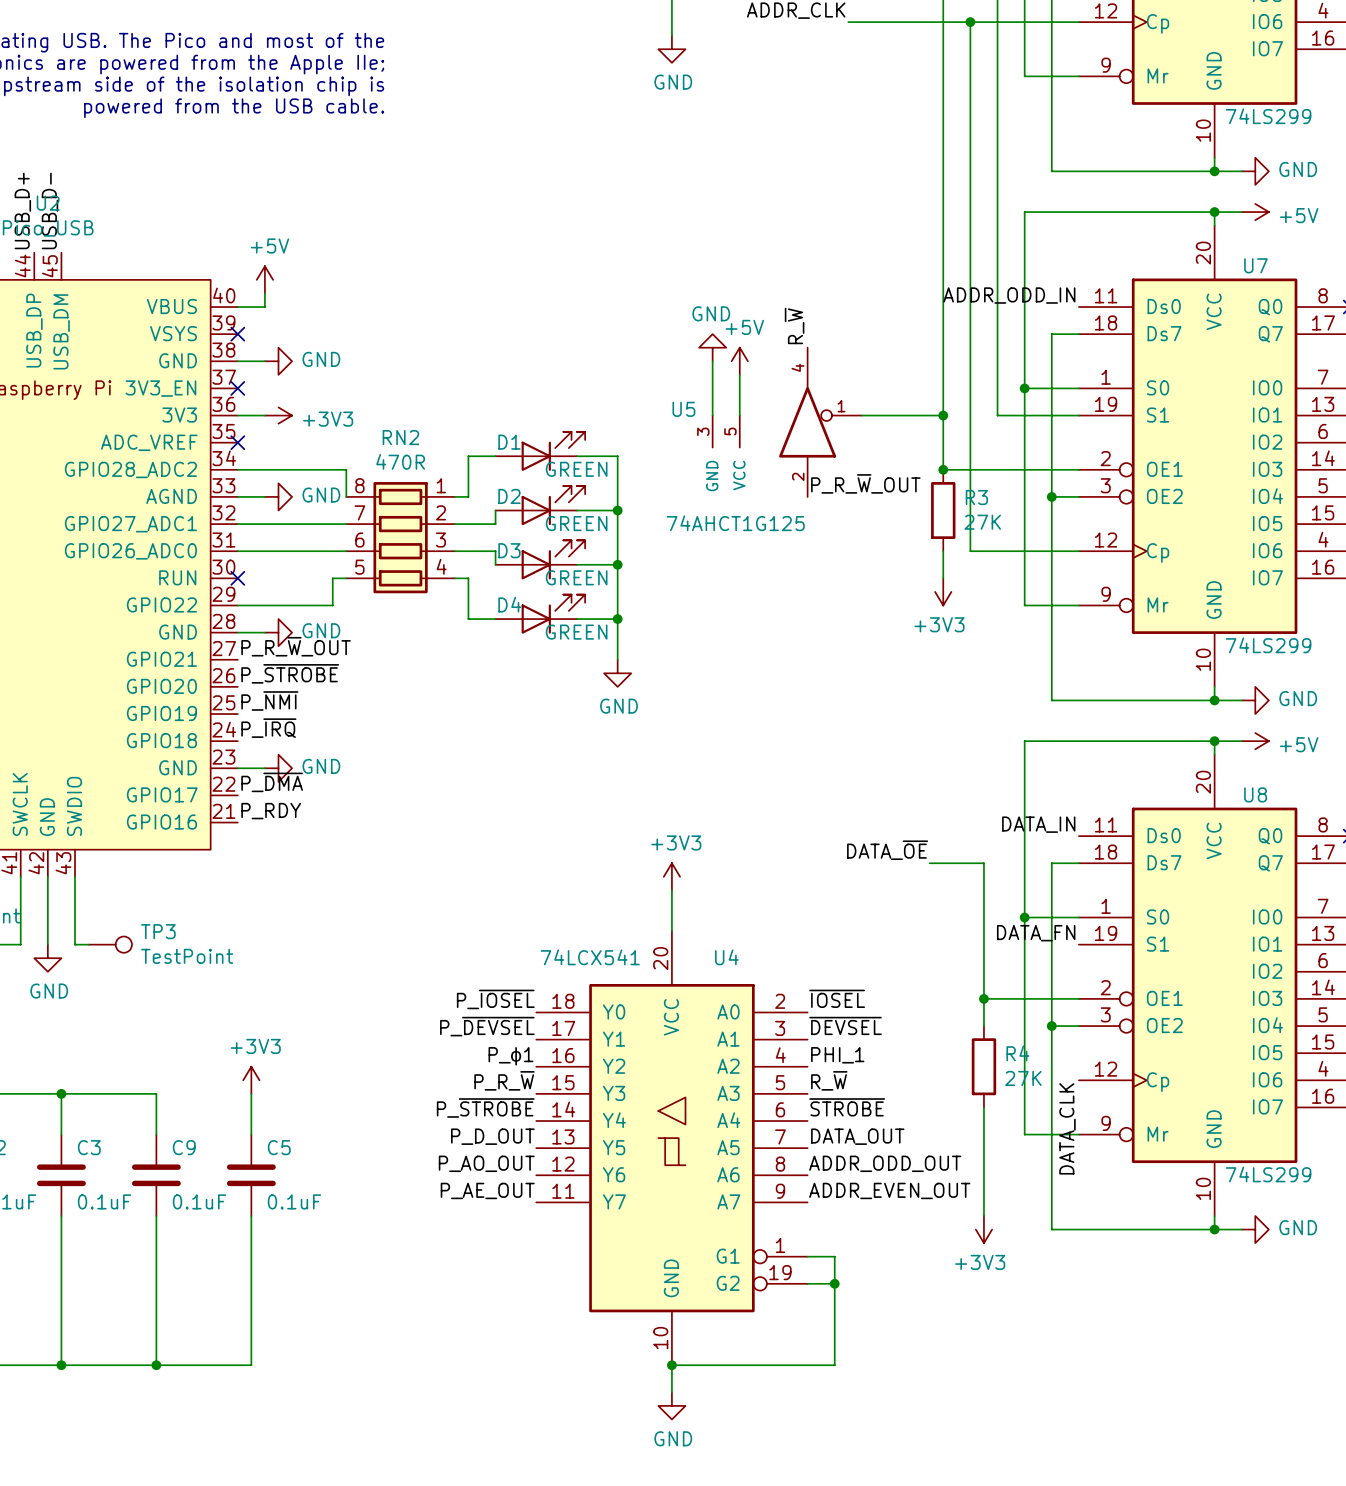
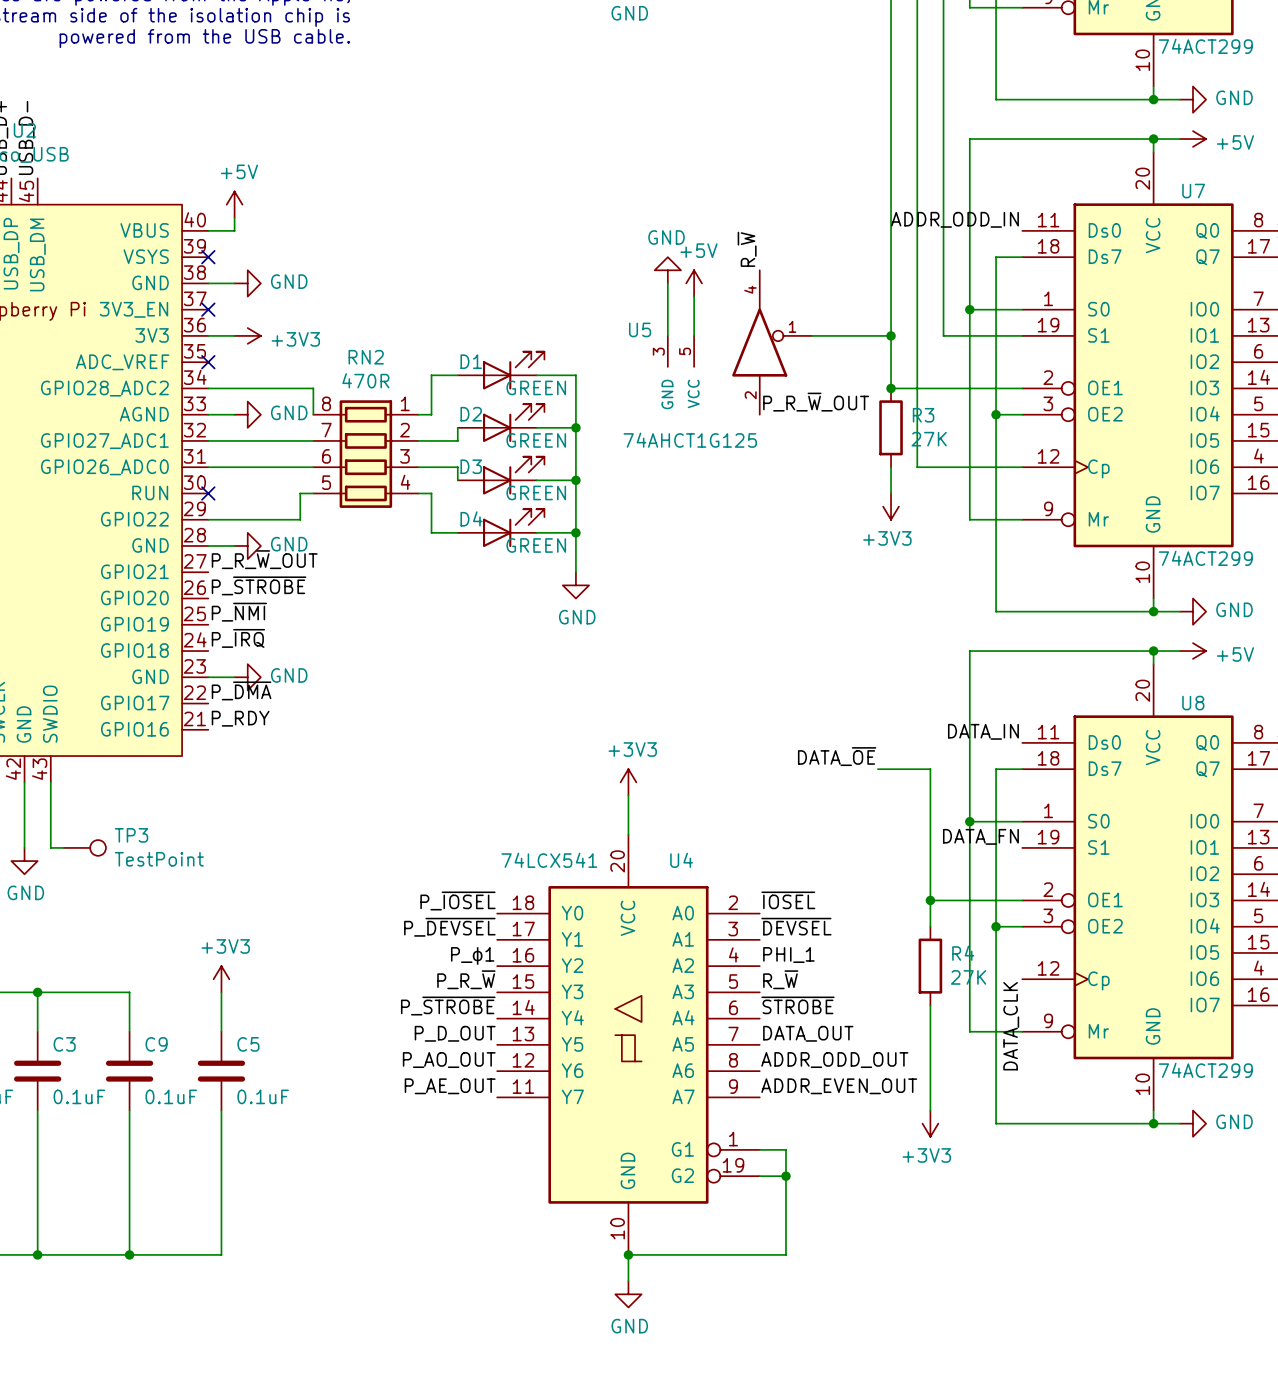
part value: 74LS299 (1268, 116) -> 74ACT299 (1205, 46)
U7 value: 74LS299 (1268, 645) -> 74ACT299 (1205, 558)
U8 value: 74LS299 (1268, 1174) -> 74ACT299 (1205, 1070)

